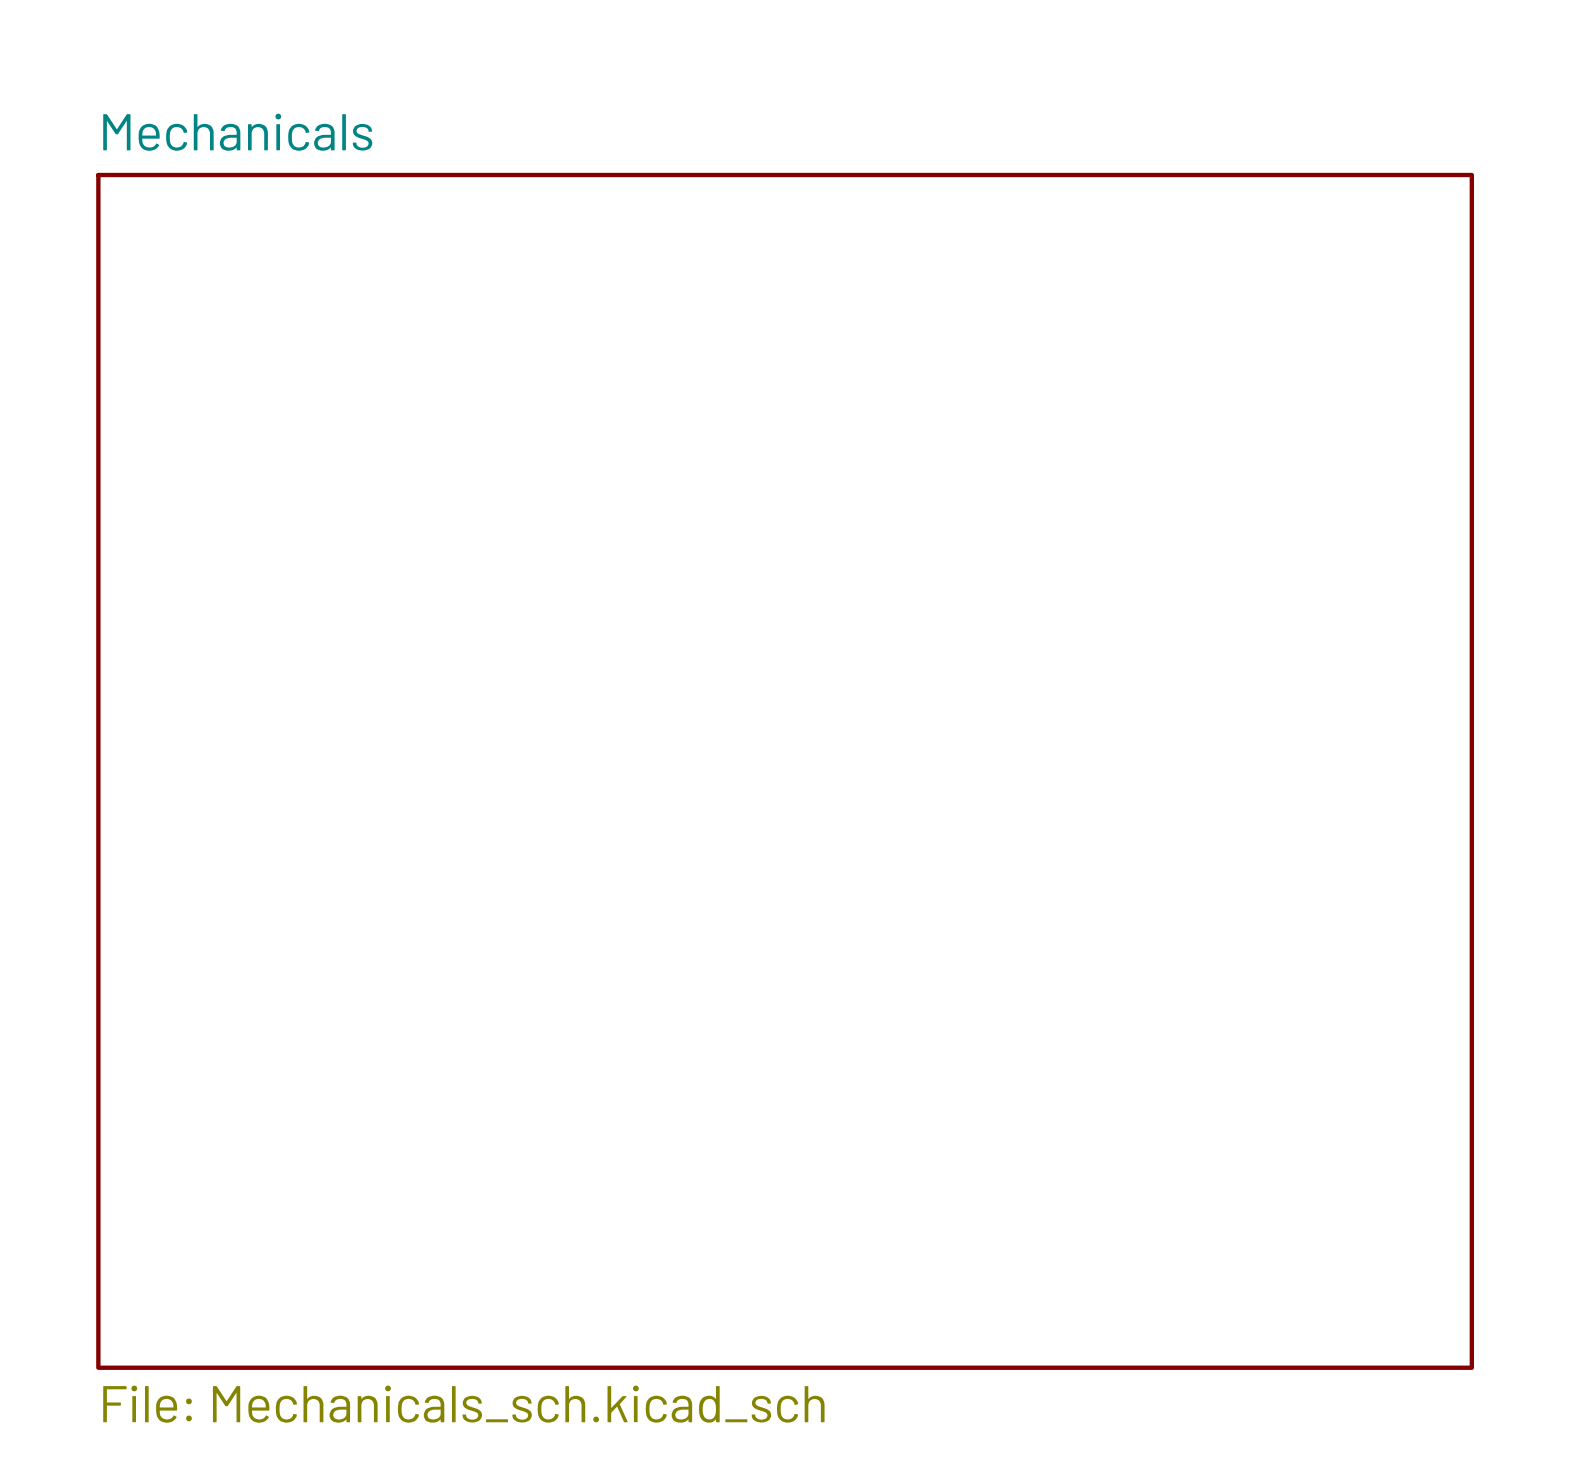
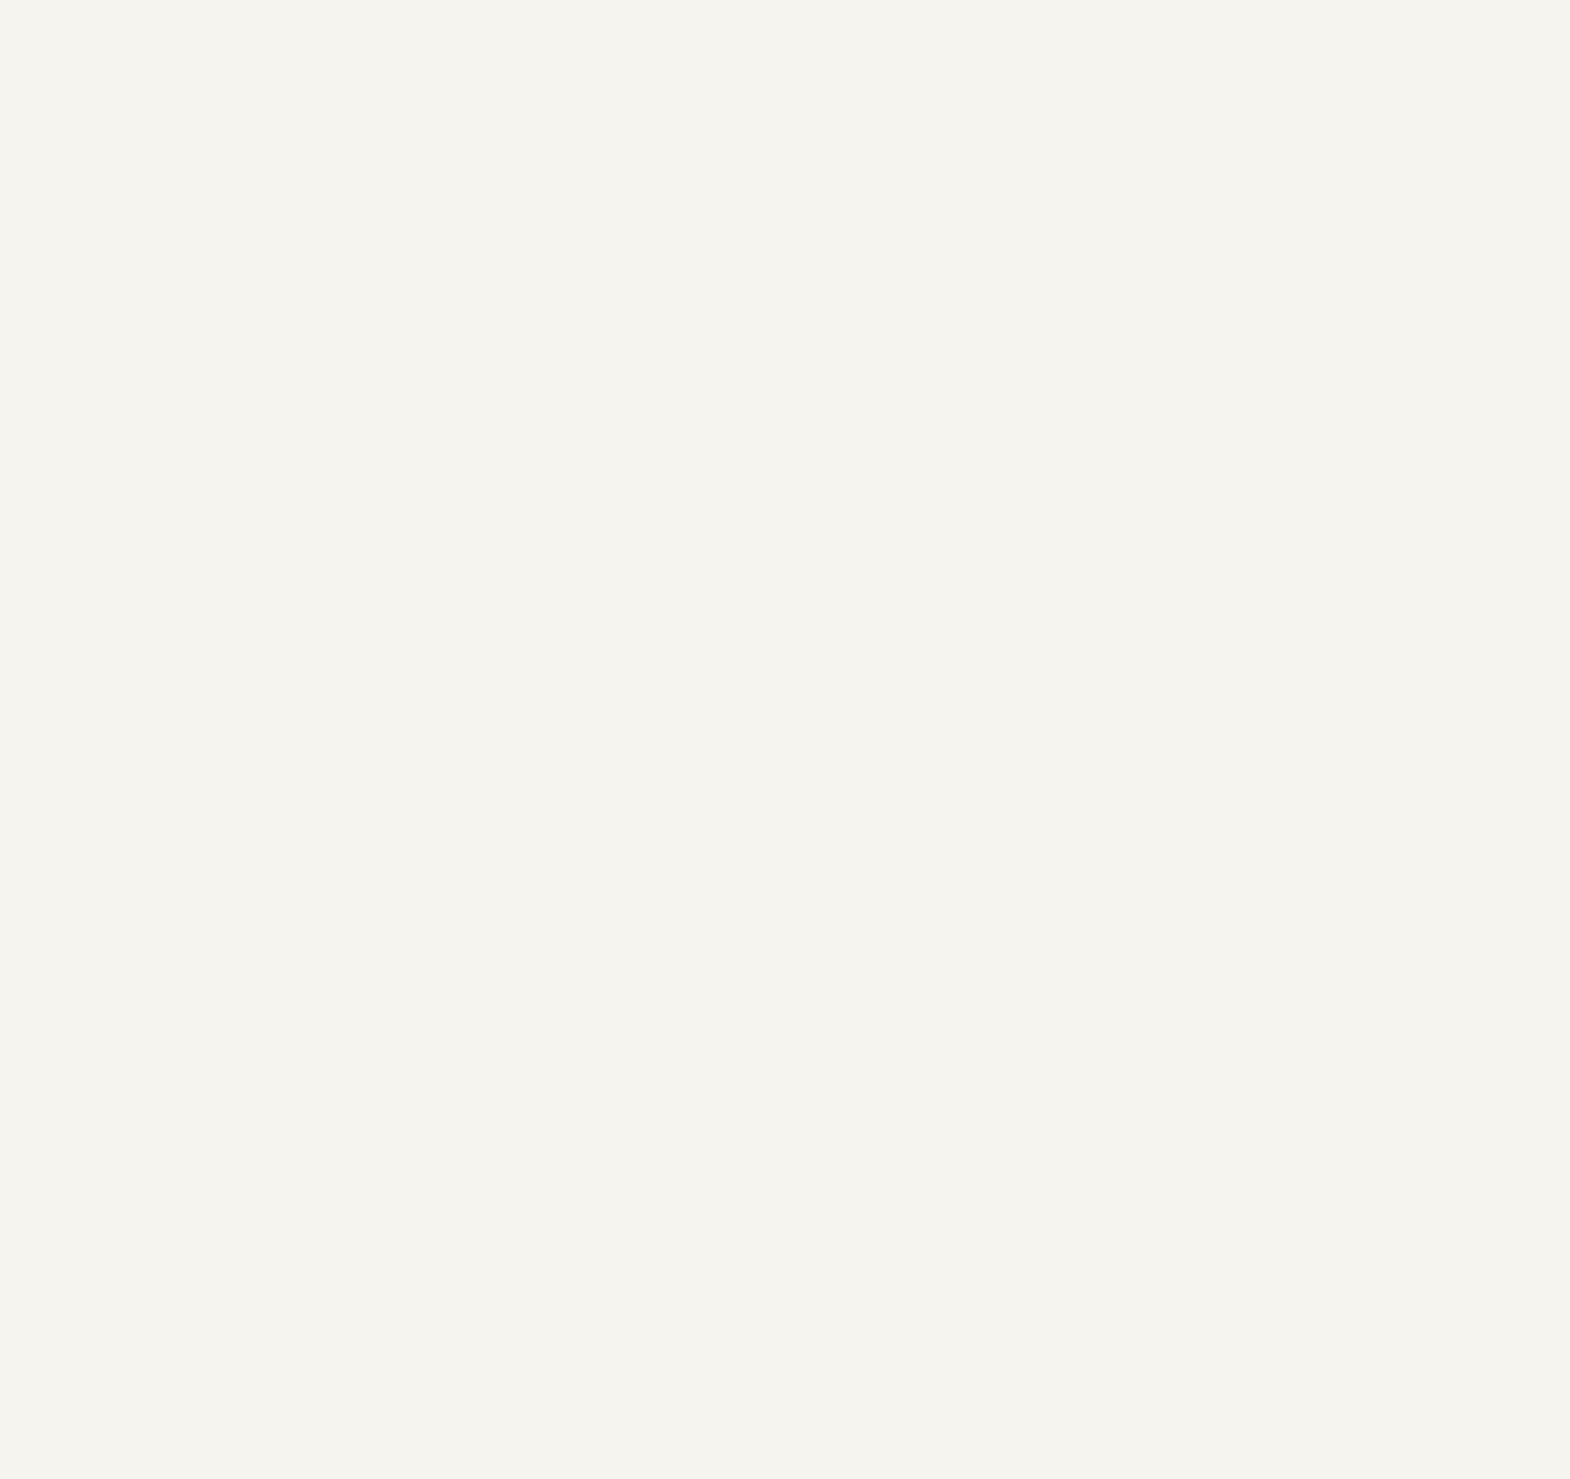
sheet Mechanicals: File: Mechanicals_sch.kicad_sch (785, 771) -> none

